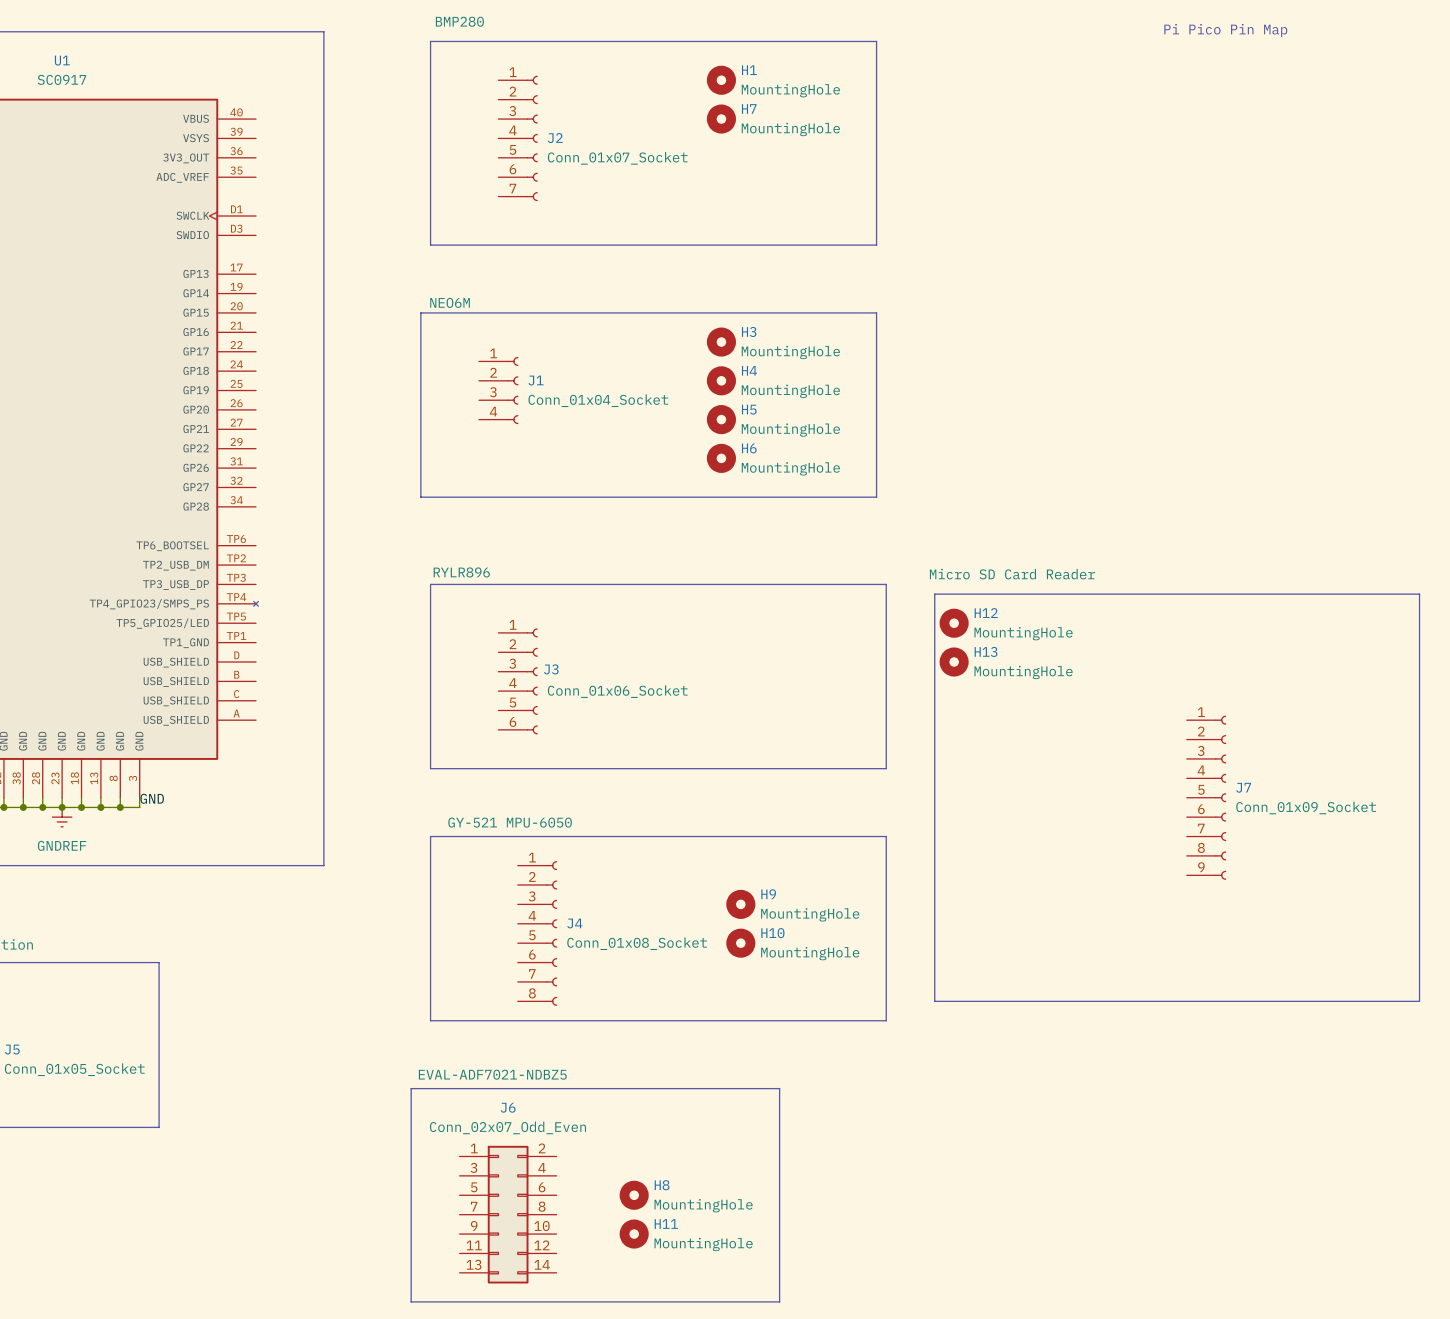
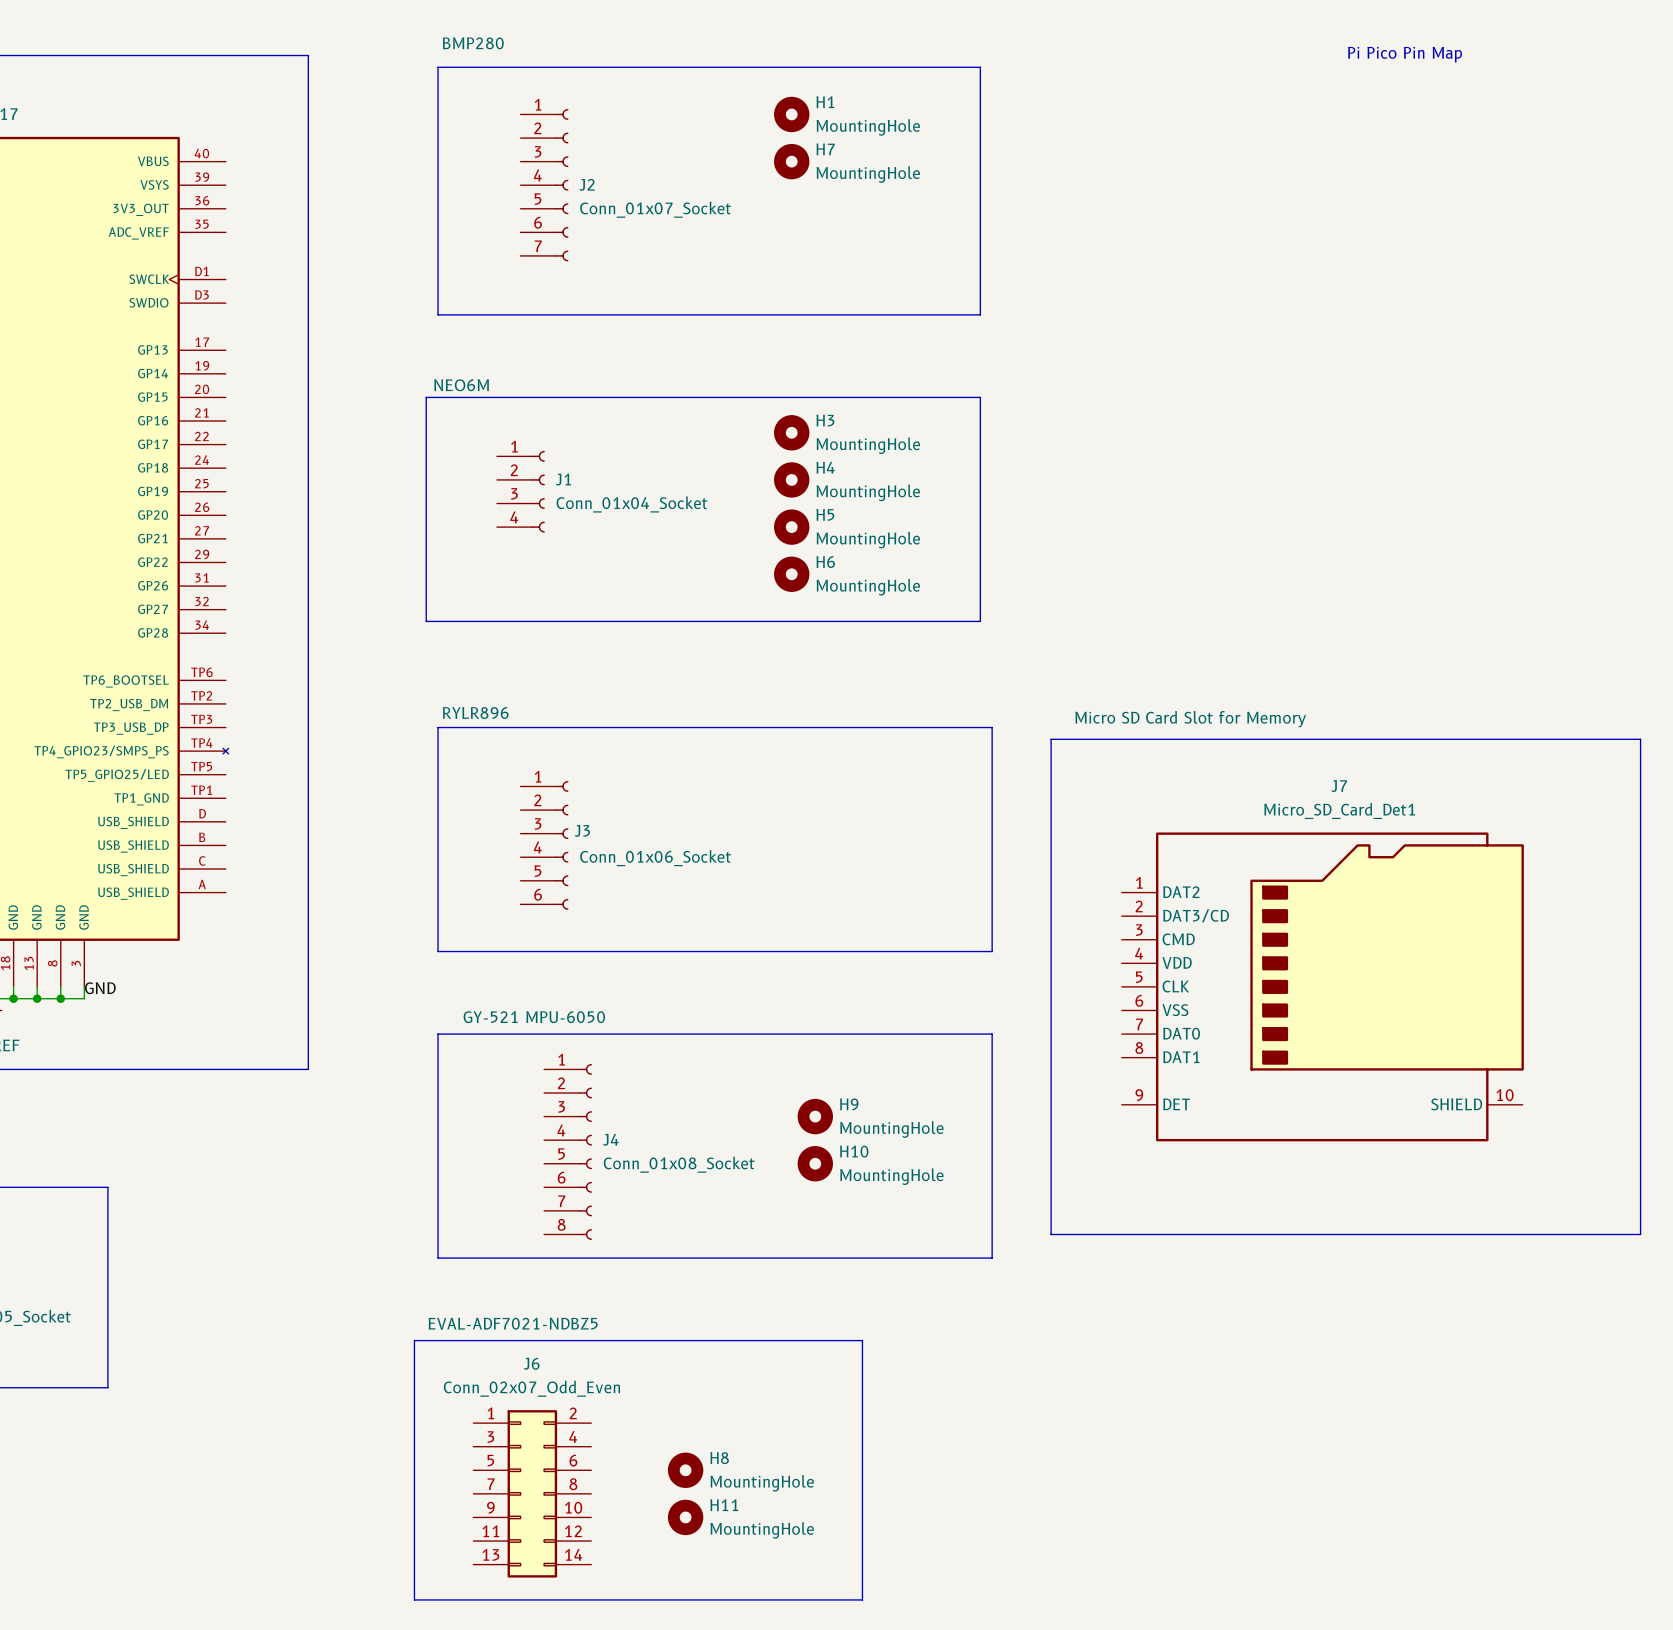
J7 text: Micro SD Card Reader (1012, 574) -> Micro SD Card Slot for Memory (1190, 719)
H12: MountingHole (954, 623) -> none
H13: MountingHole (954, 662) -> none
J7 symbol: [1186, 715, 1227, 880] -> [1121, 832, 1524, 1142]
J7 name position: J7 (1243, 787) -> J7 (1339, 786)
J7 value: Conn_01x09_Socket (1306, 807) -> Micro_SD_Card_Det1 (1339, 810)

